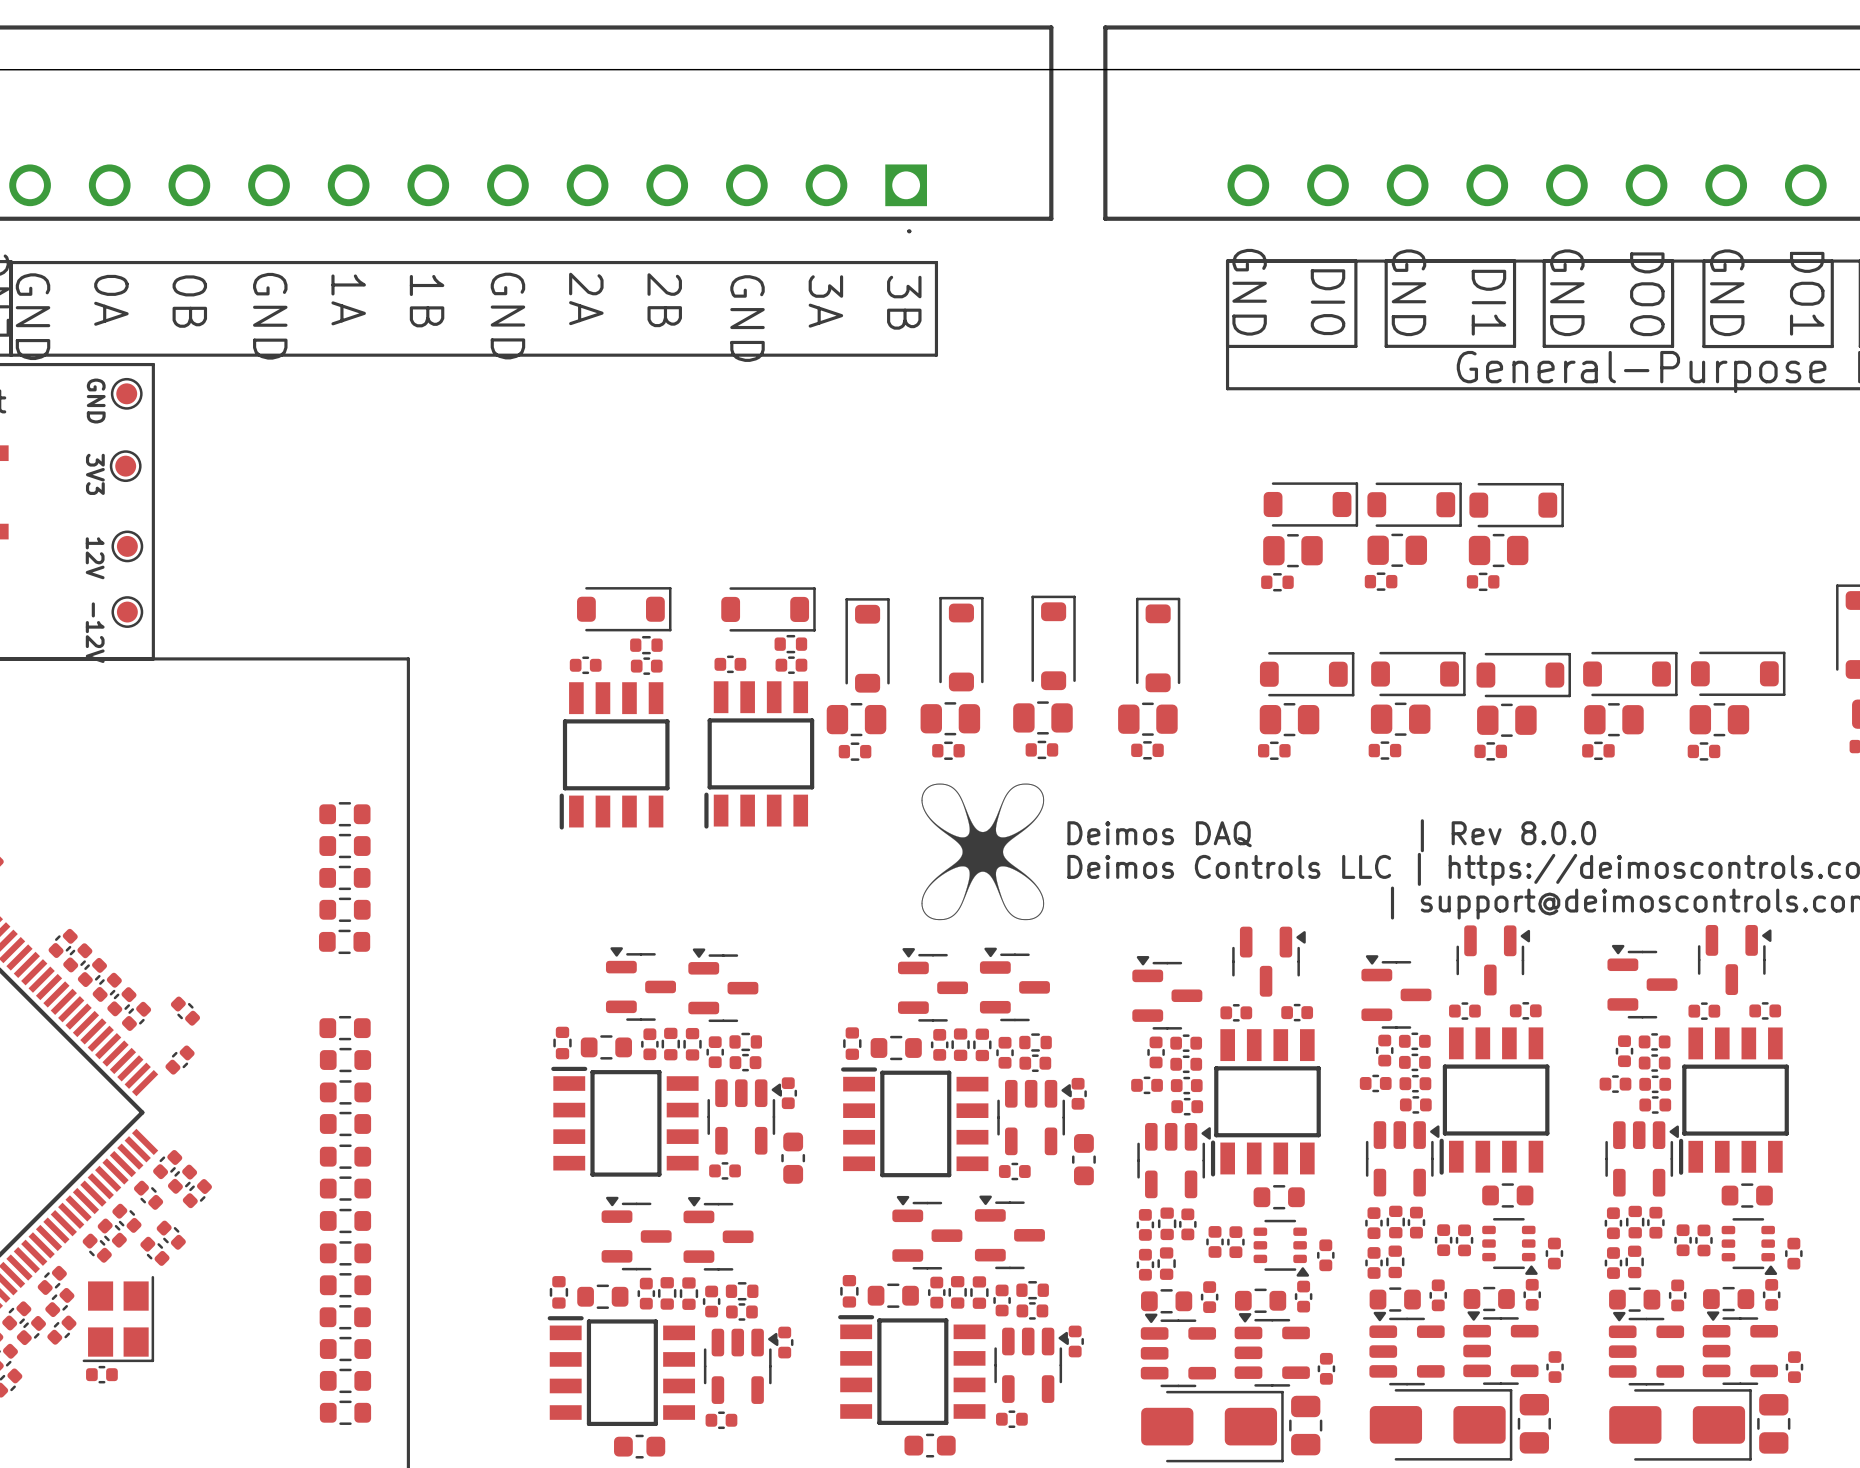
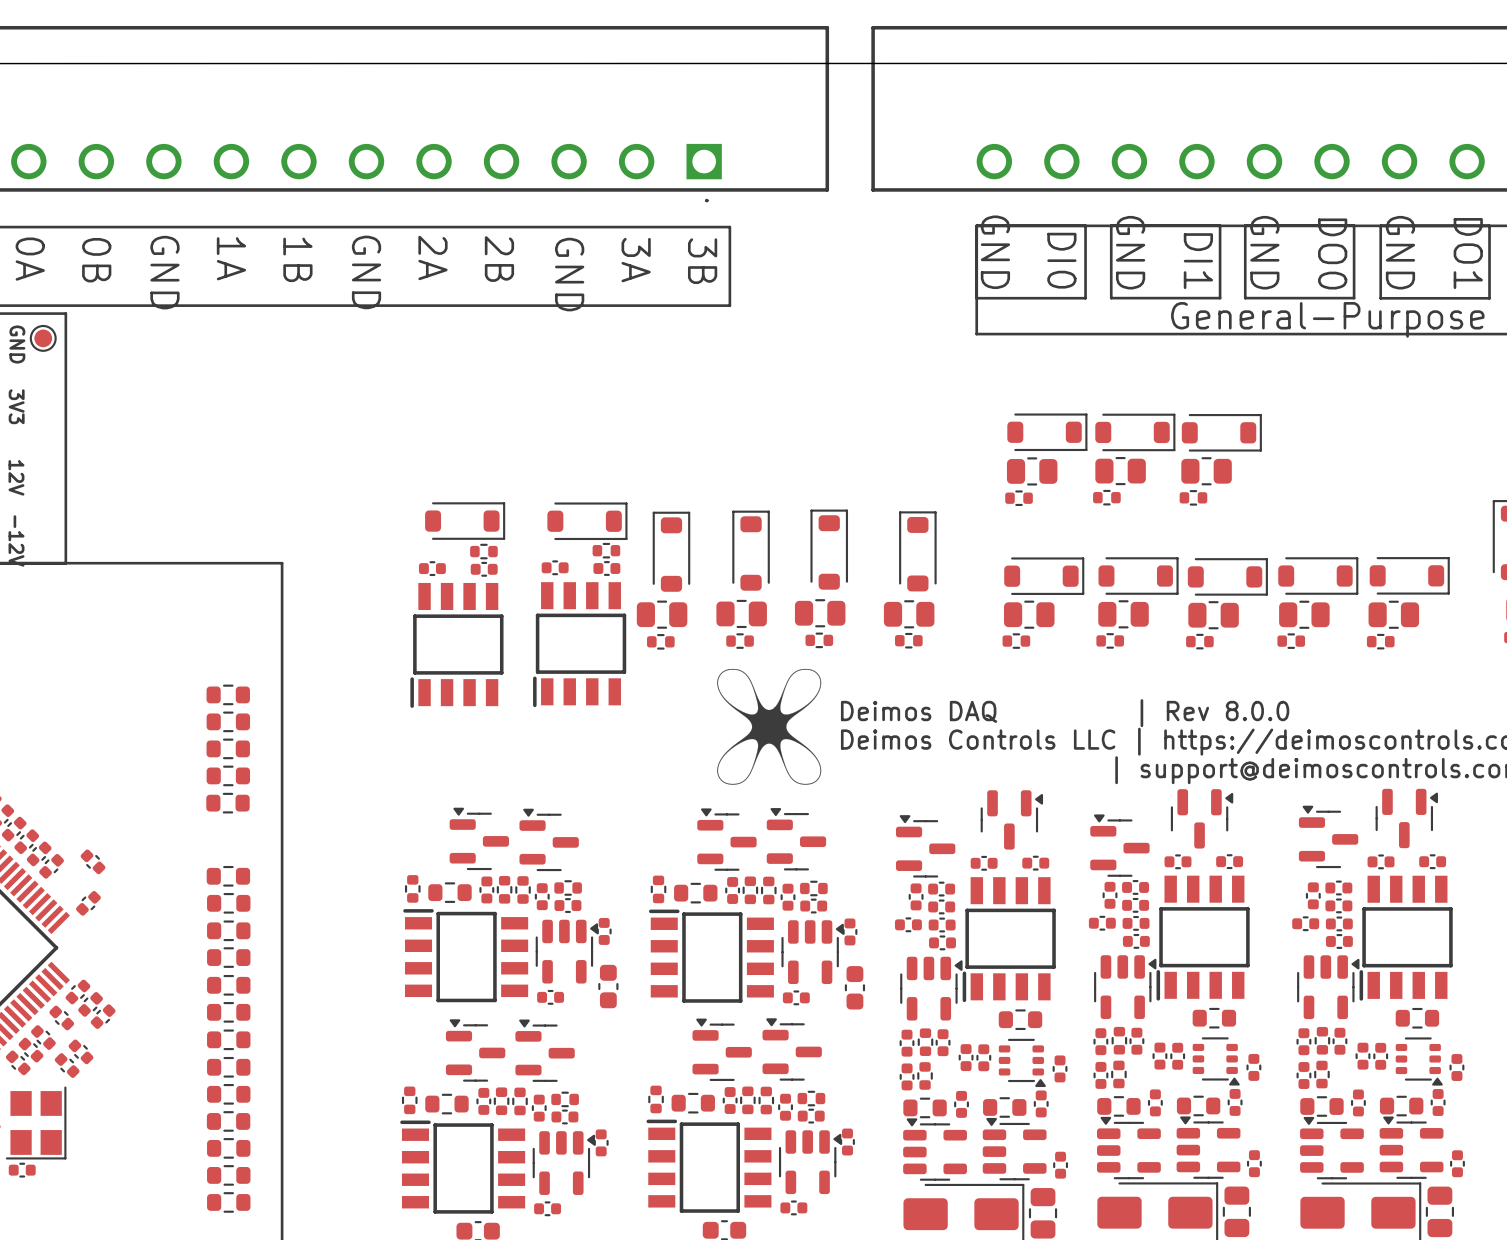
part: (125, 466) -> none
part: (127, 546) -> none
part: (127, 612) -> none

